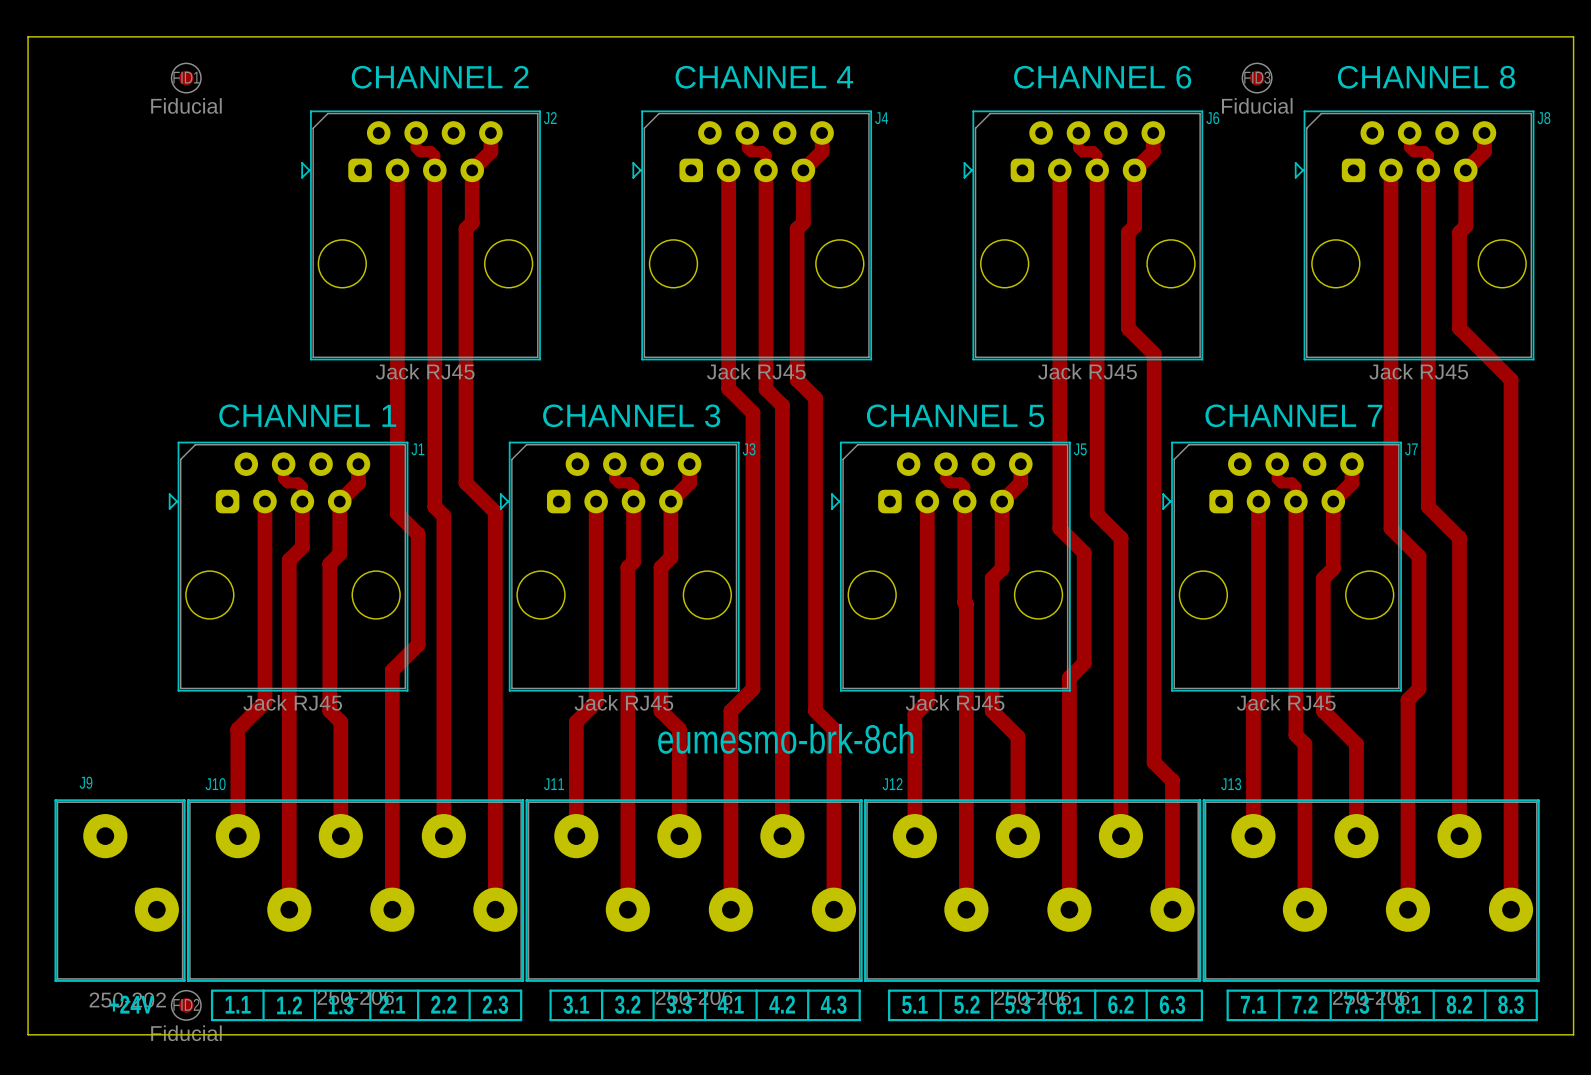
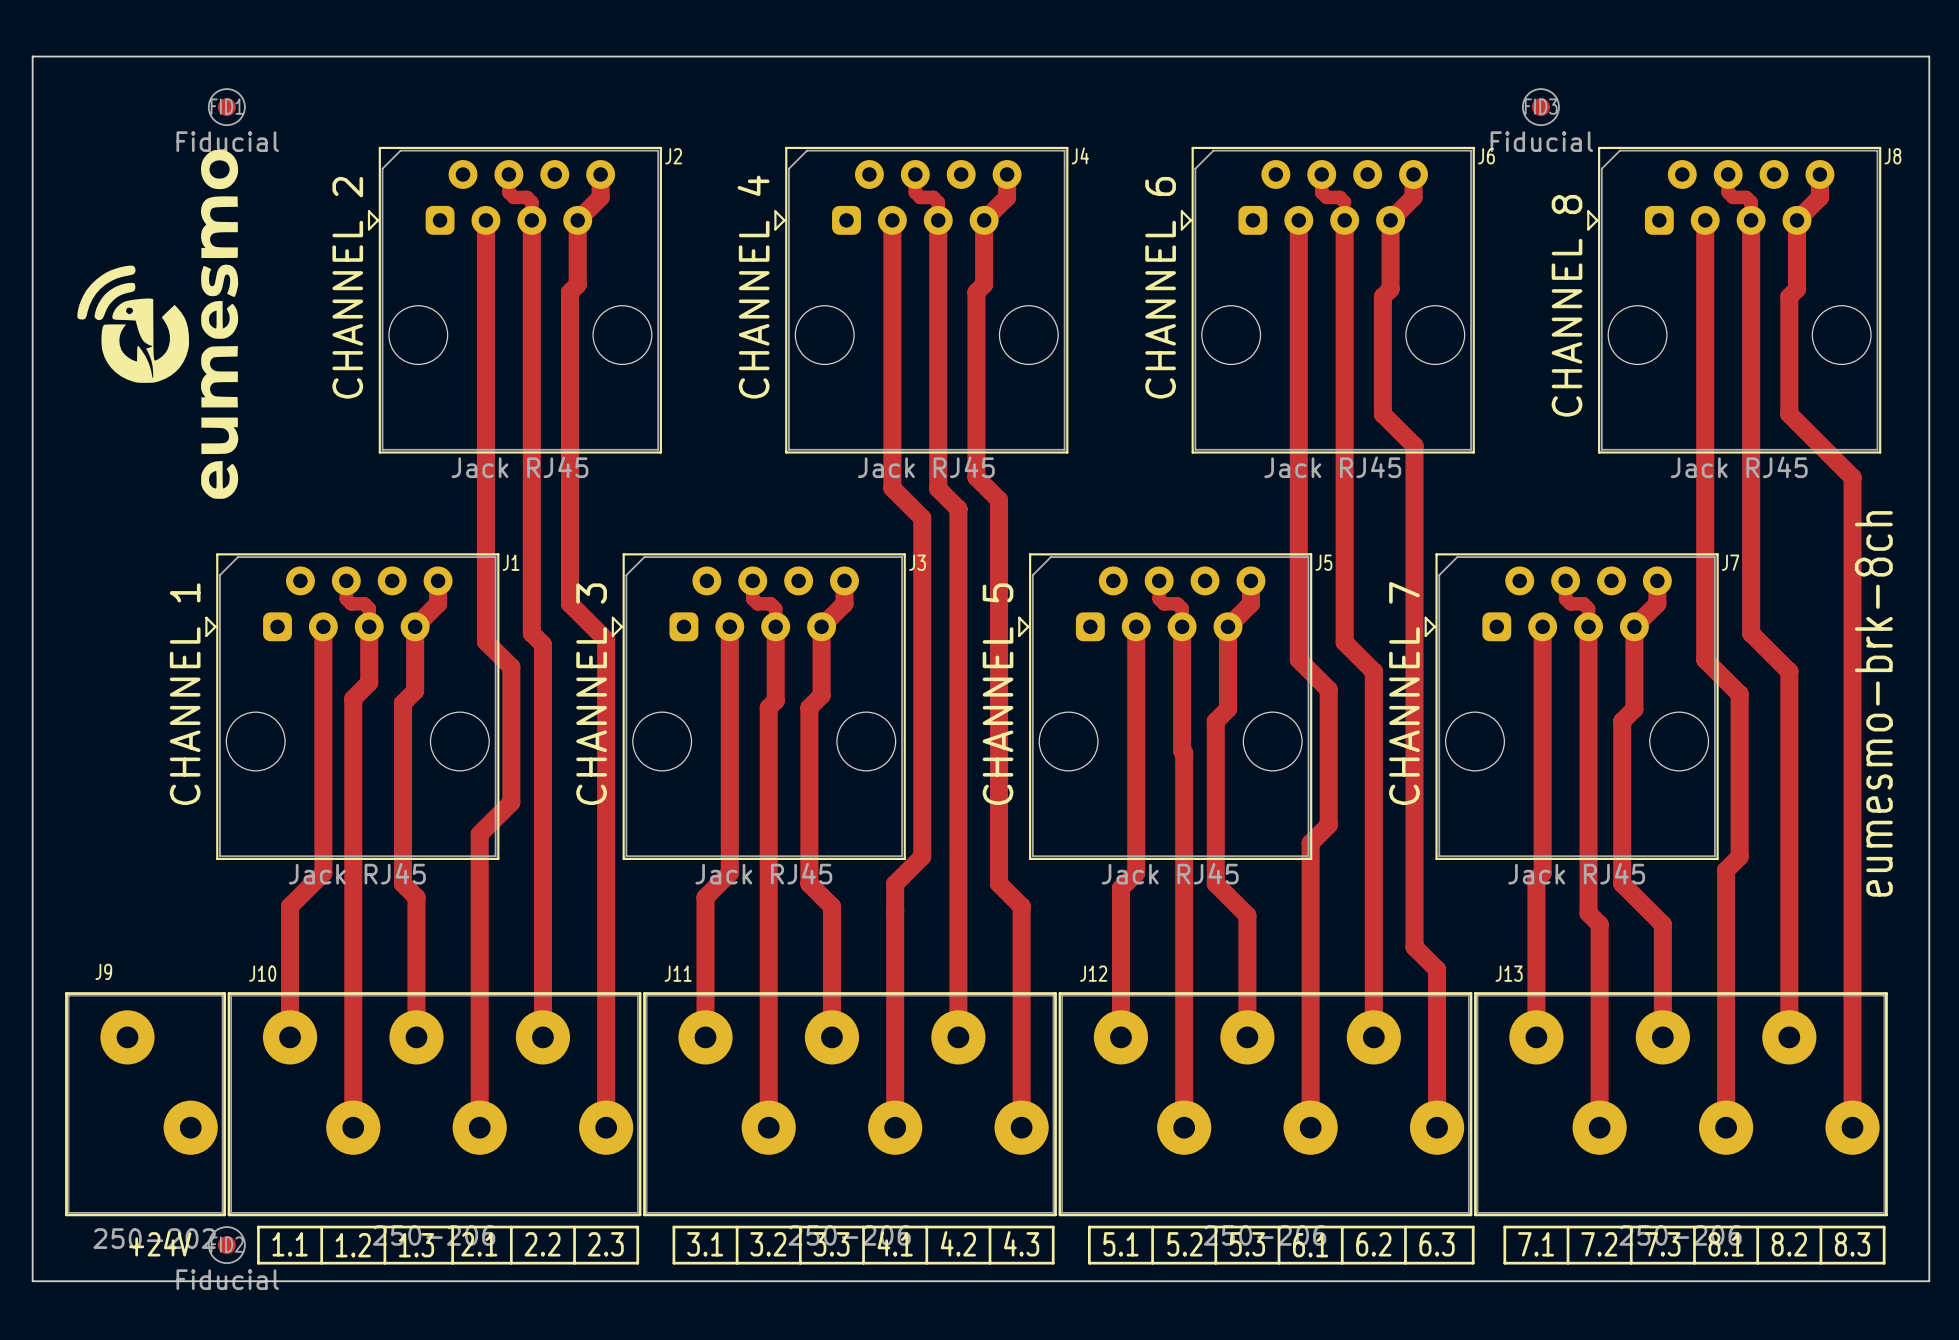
text rotation: 0° (440, 77) -> 90° counterclockwise (347, 287)
text position: CHANNEL 2 (440, 77) -> CHANNEL 2 (347, 287)
text rotation: 0° (764, 77) -> 90° counterclockwise (753, 287)
text rotation: 0° (1102, 77) -> 90° counterclockwise (1160, 287)
text position: CHANNEL 6 (1102, 77) -> CHANNEL 6 (1160, 287)
text rotation: 0° (1426, 77) -> 90° counterclockwise (1567, 305)
text position: CHANNEL 8 (1426, 77) -> CHANNEL 8 (1567, 305)
drawing: none -> [77, 149, 239, 499]
text rotation: 0° (307, 415) -> 90° counterclockwise (185, 694)
text rotation: 0° (631, 415) -> 90° counterclockwise (591, 694)
text rotation: 0° (955, 415) -> 90° counterclockwise (998, 694)
text rotation: 0° (1293, 415) -> 90° counterclockwise (1404, 693)
text: none -> eumesmo-brk-8ch (1873, 703)
text: eumesmo-brk-8ch (785, 738) -> none

